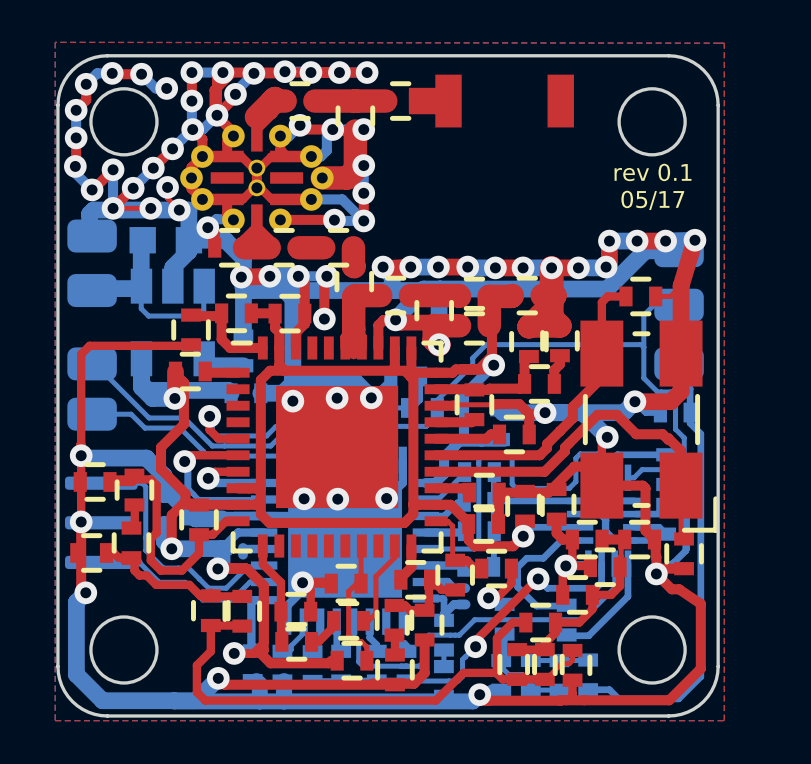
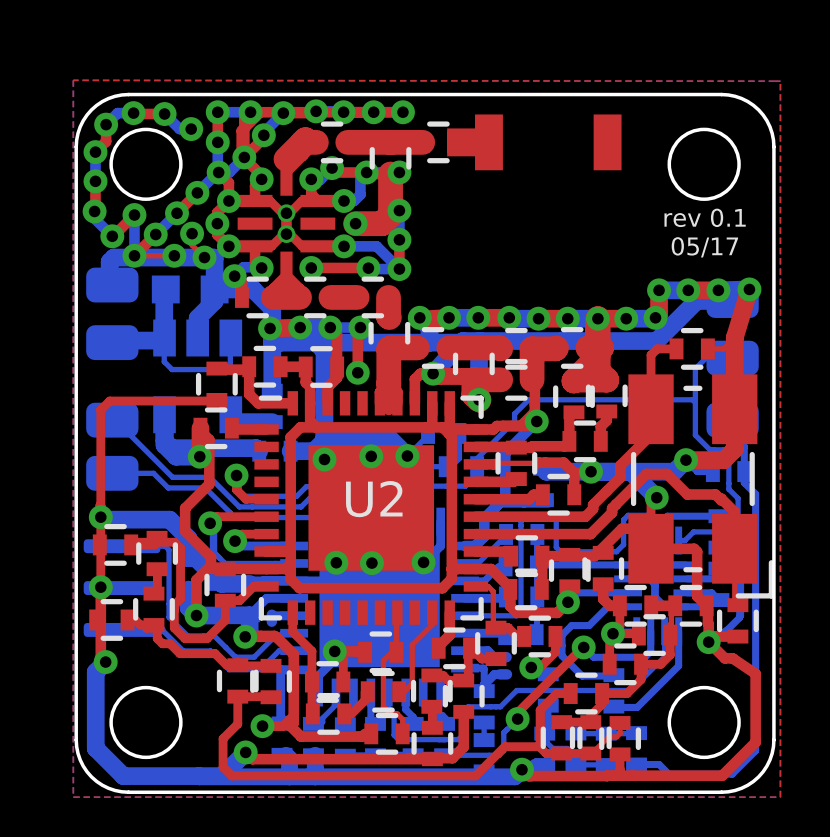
part: (337, 447) -> none
U2: none -> (371, 507)

